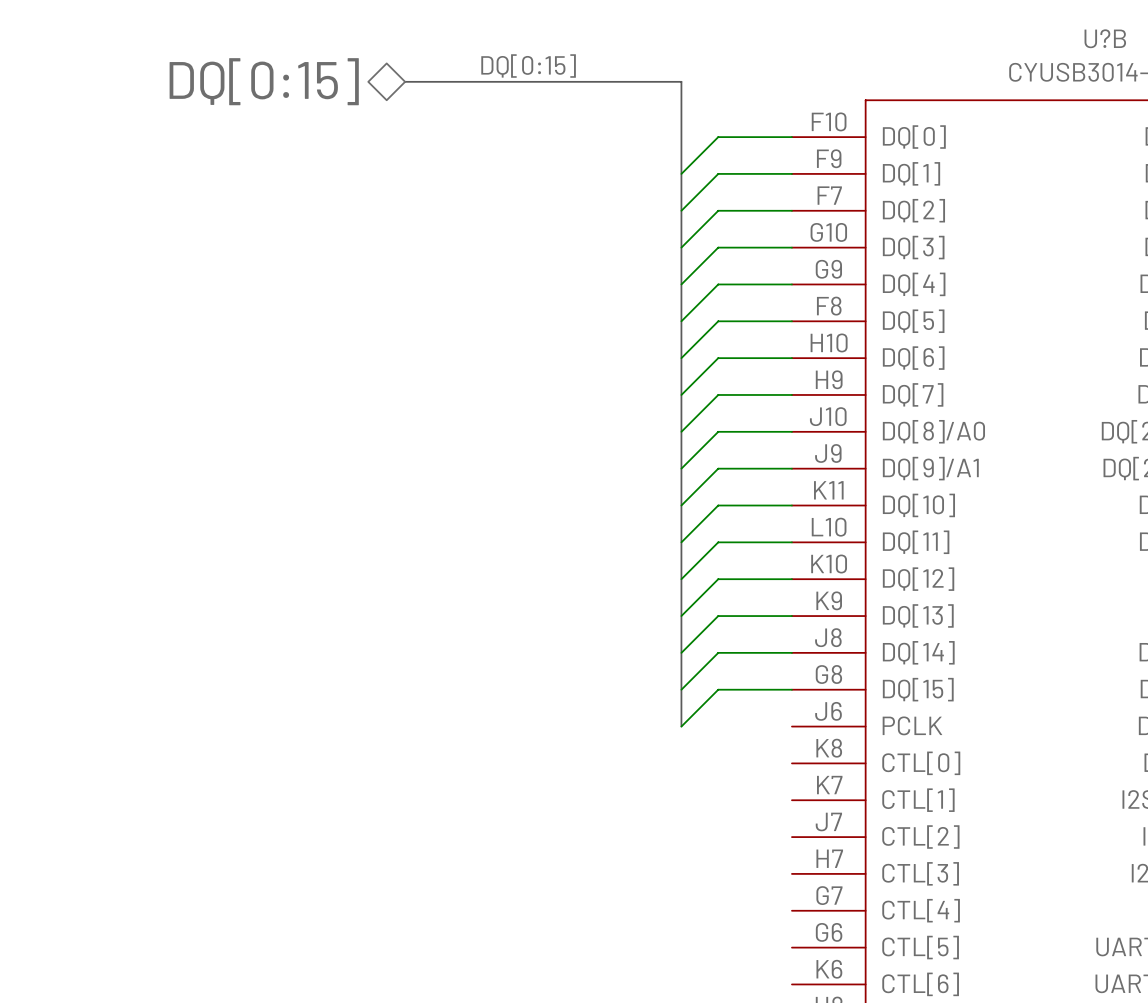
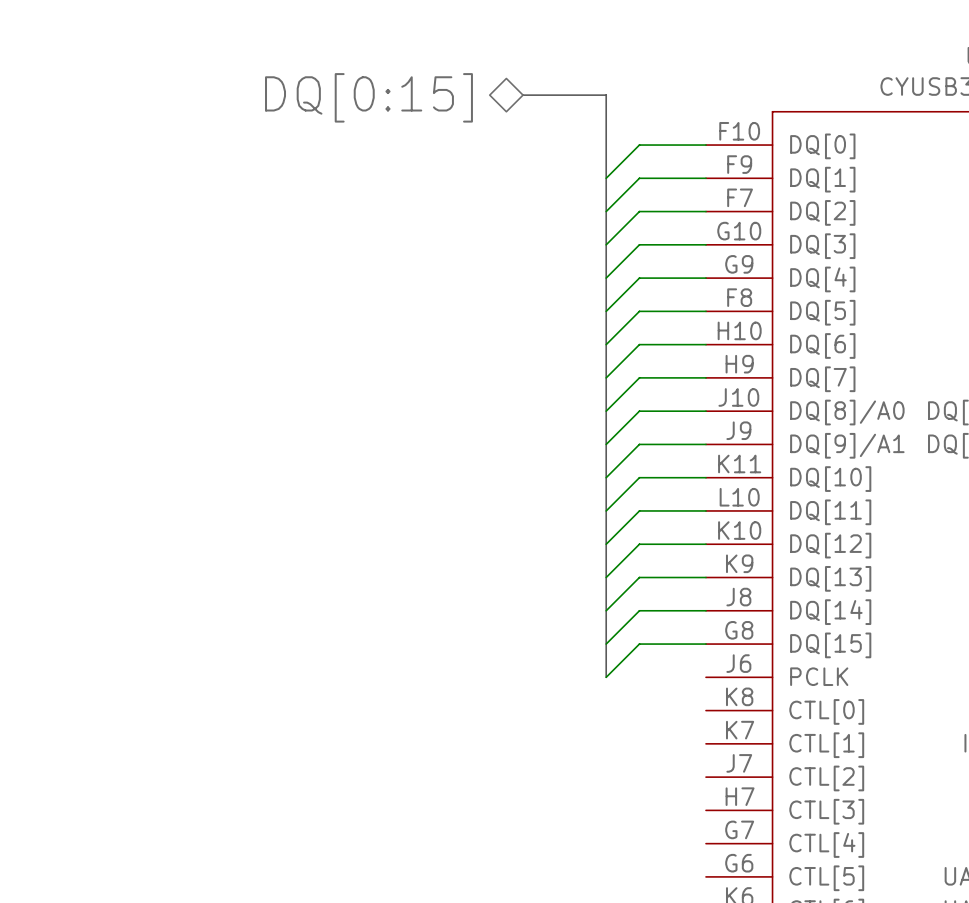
label: DQ[0:15] (528, 66) -> none
hierarchical label position: DQ[0:15] (264, 81) -> DQ[0:15] (368, 97)
bus: (405, 81) (589, 81) -> none

